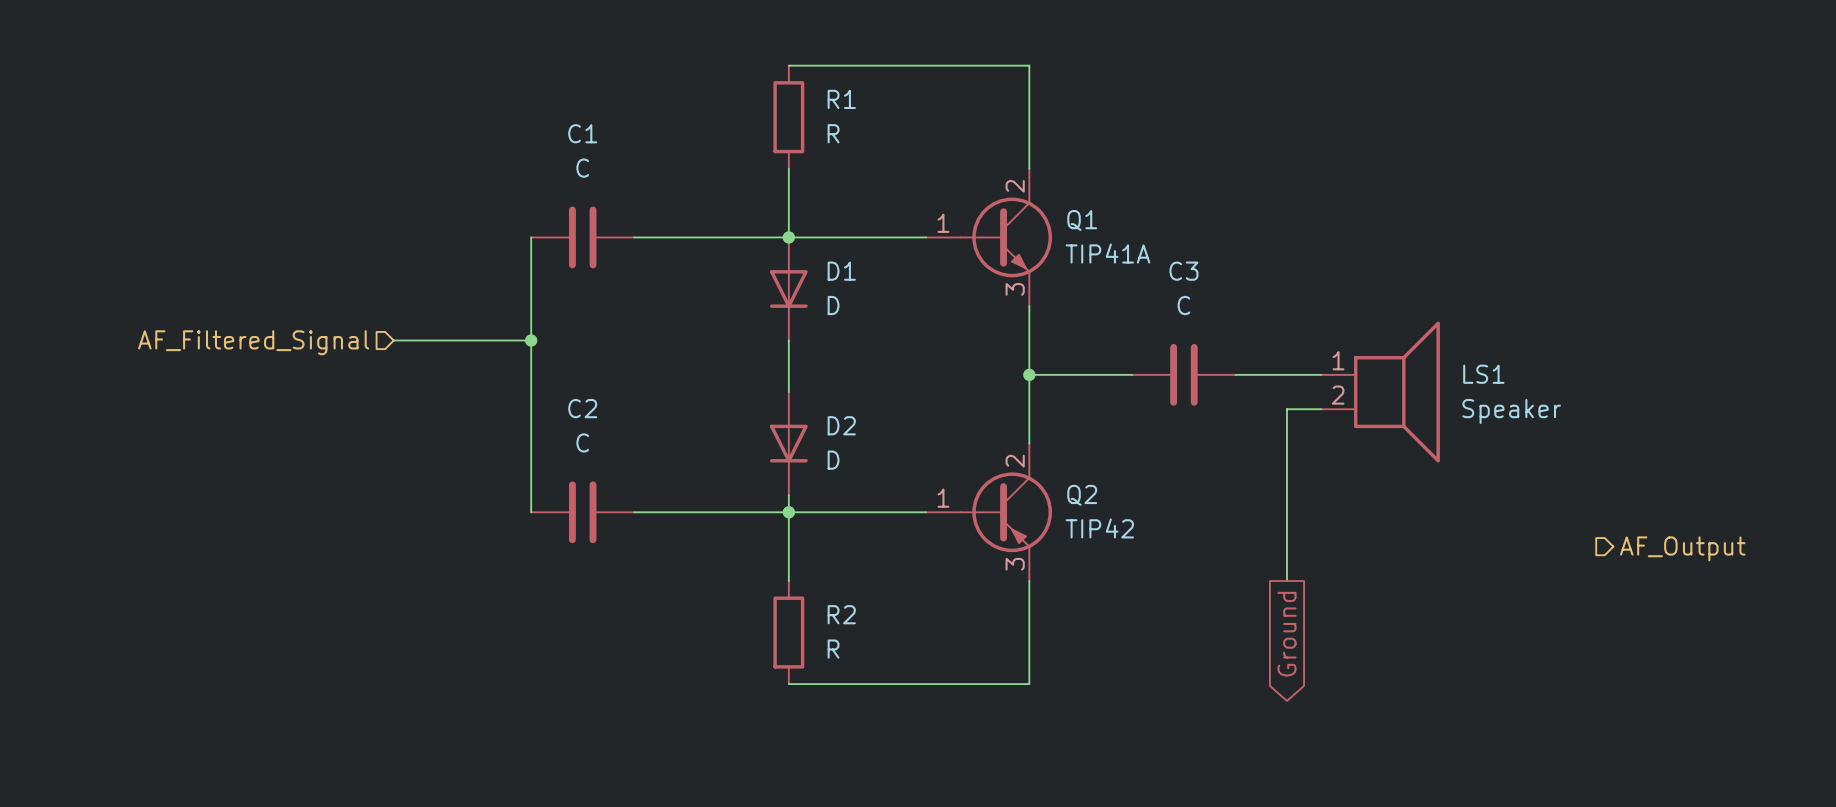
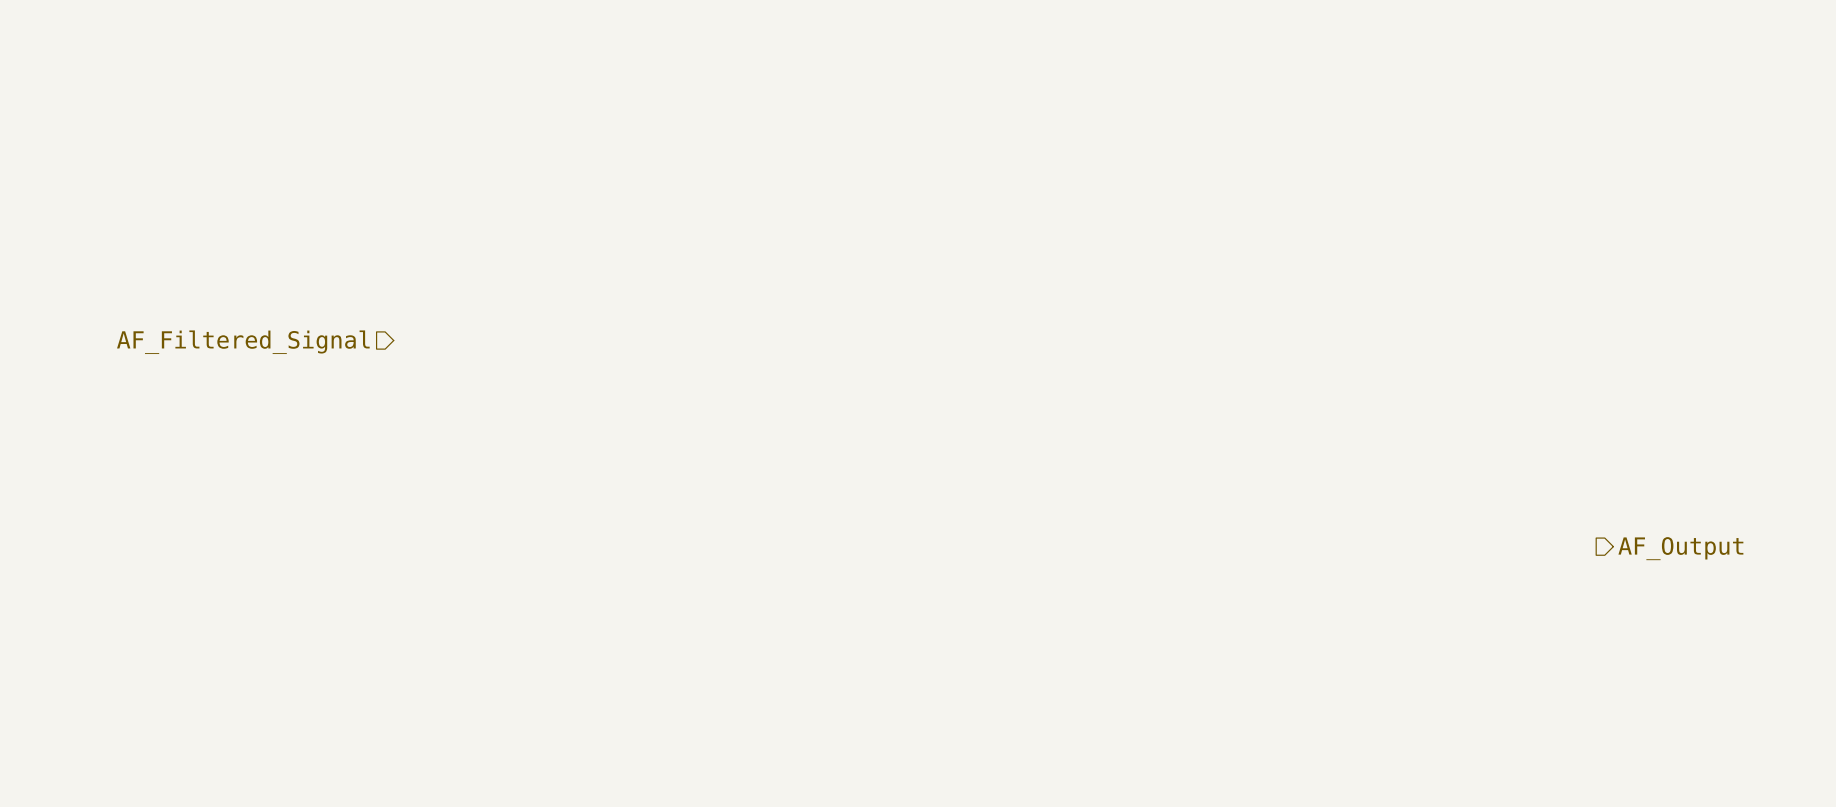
wire: (788, 65) (1029, 65) (1029, 168) -> none
R1: R (788, 117) -> none
wire: (788, 168) (788, 237) -> none
wire: (531, 237) (531, 512) -> none
C1: C (582, 237) -> none
wire: (634, 237) (926, 237) -> none
junction: (788, 237) -> none
Q1: TIP41A (989, 237) -> none
D1: D (788, 288) -> none
wire: (1029, 306) (1029, 443) -> none
wire: (393, 340) (531, 340) -> none
junction: (531, 340) -> none
wire: (788, 340) (788, 392) -> none
wire: (1029, 374) (1132, 374) -> none
junction: (1029, 374) -> none
C3: C (1183, 374) -> none
wire: (1235, 374) (1321, 374) -> none
LS1: Speaker (1380, 392) -> none
wire: (1321, 409) (1287, 409) (1287, 581) -> none
D2: D (788, 443) -> none
wire: (788, 495) (788, 581) -> none
C2: C (582, 512) -> none
wire: (634, 512) (926, 512) -> none
junction: (788, 512) -> none
Q2: TIP42 (989, 512) -> none
wire: (1029, 581) (1029, 684) (788, 684) -> none
R2: R (788, 632) -> none
global label: Ground (1287, 634) -> none

